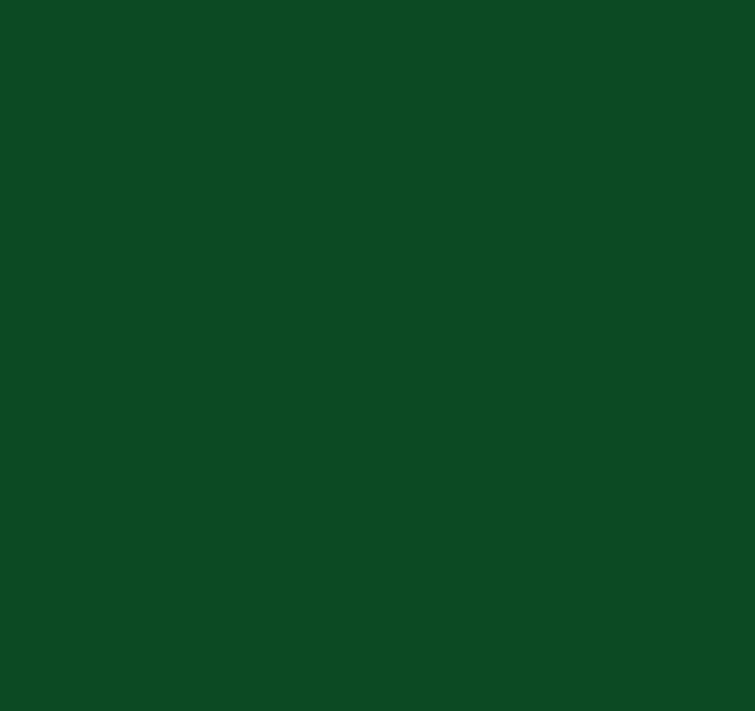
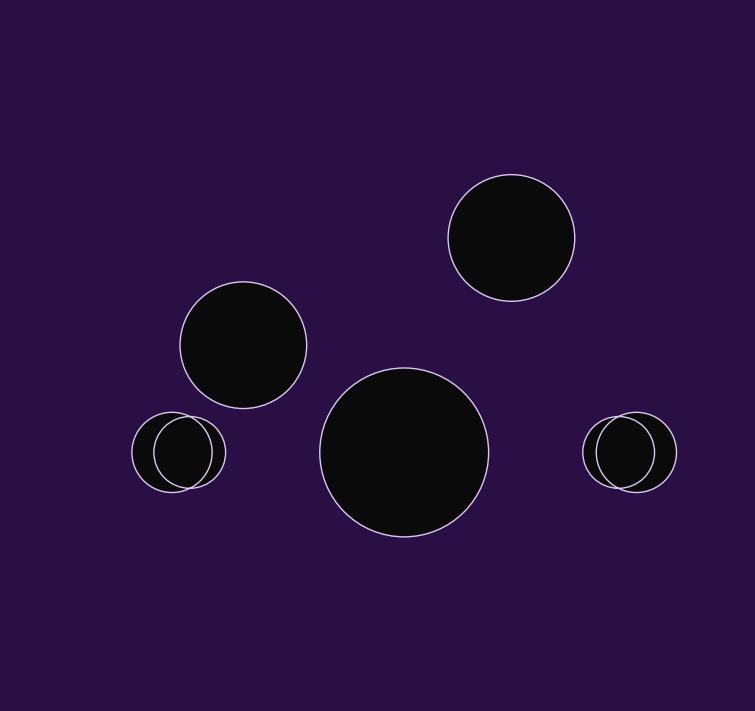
part: none -> (404, 355)

